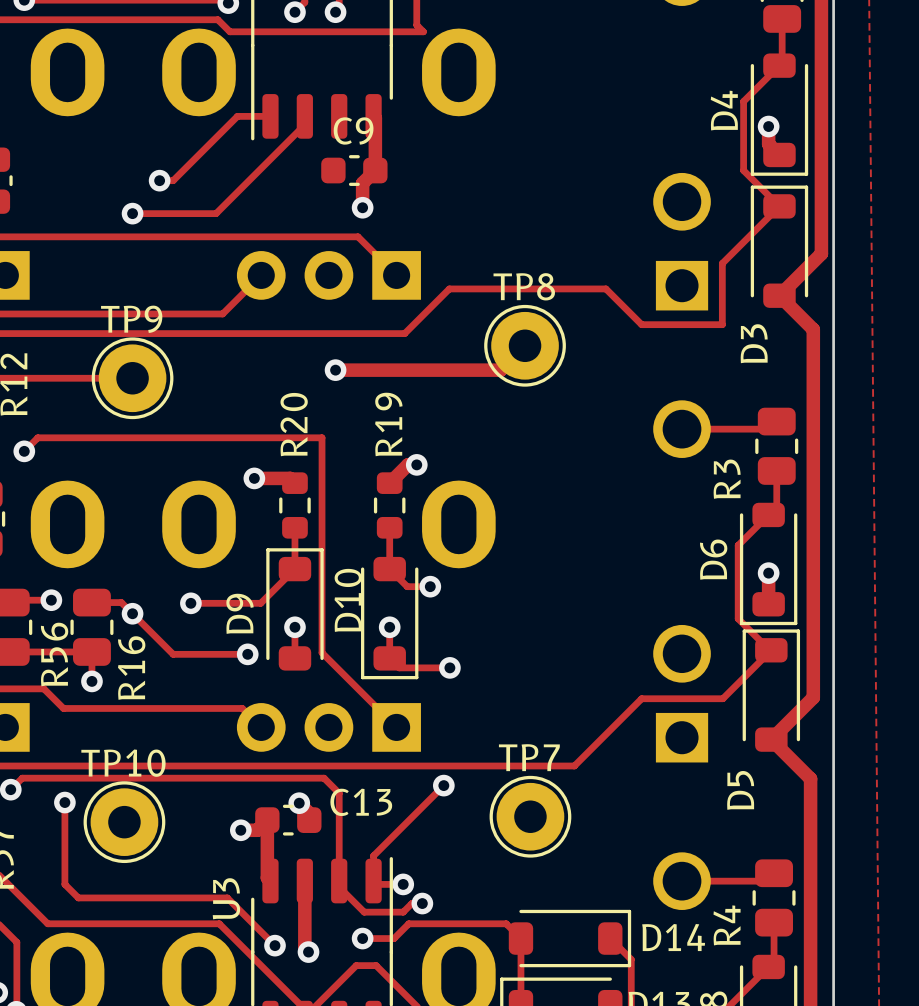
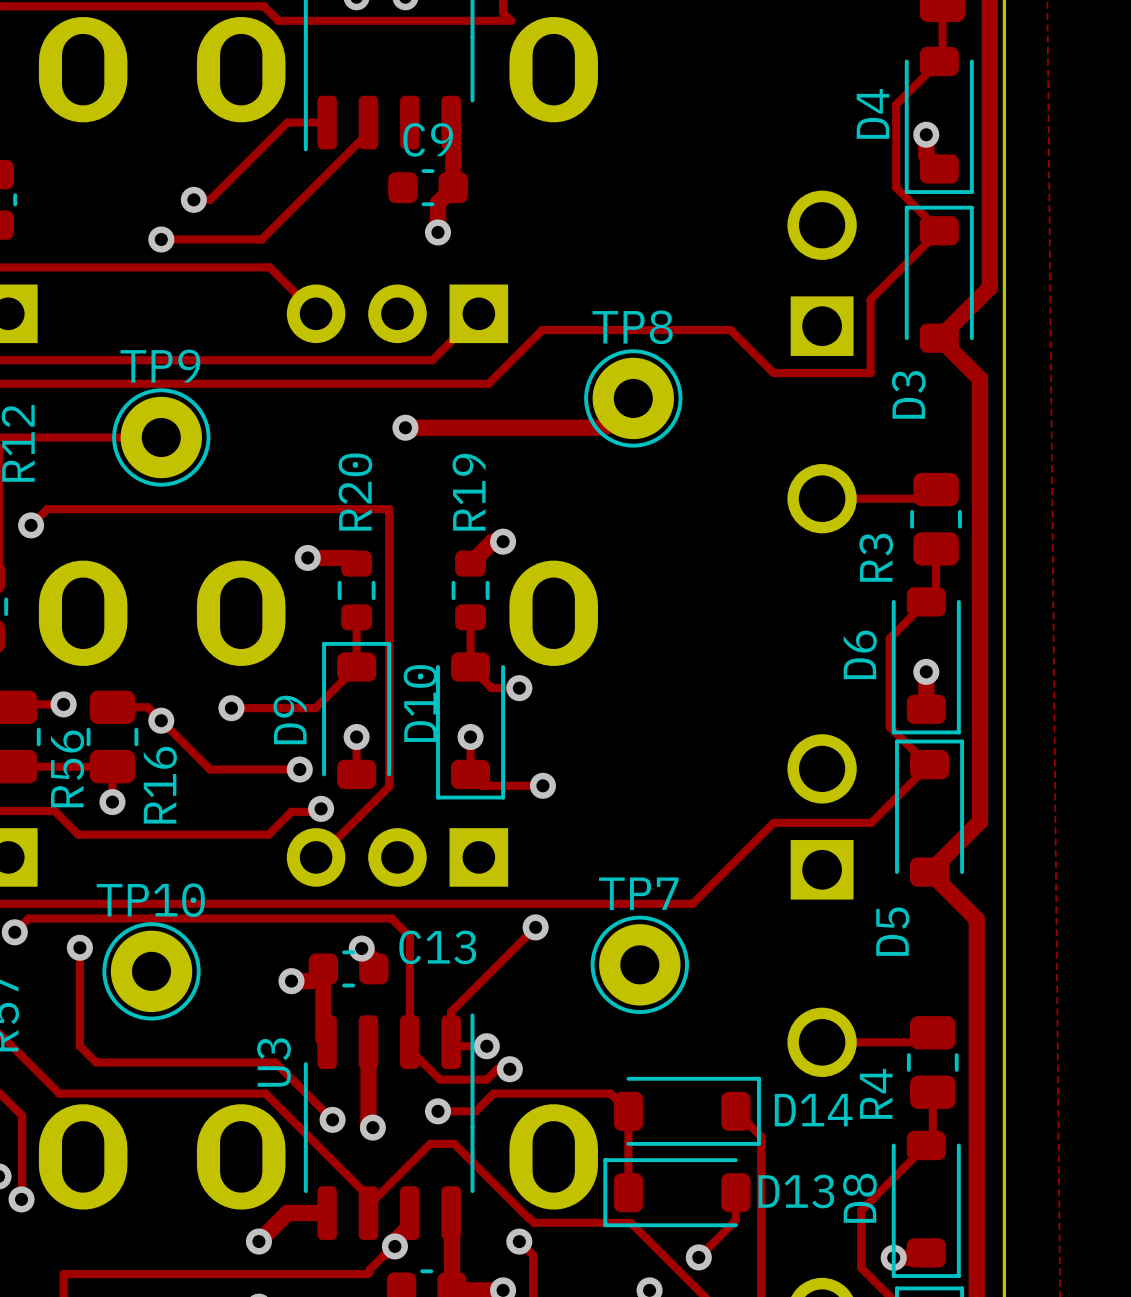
track: (222, 236) (358, 236) (396, 275) -> (269, 360) (432, 360) (478, 313)
track: (261, 275) (222, 313) -> (316, 313) (269, 267)
track: (322, 652) (396, 727) -> (389, 767) (389, 786) (318, 857)
via: none -> (321, 808)
track: (221, 708) (242, 708) (261, 727) -> (268, 834) (291, 811) (318, 811) (321, 808)

